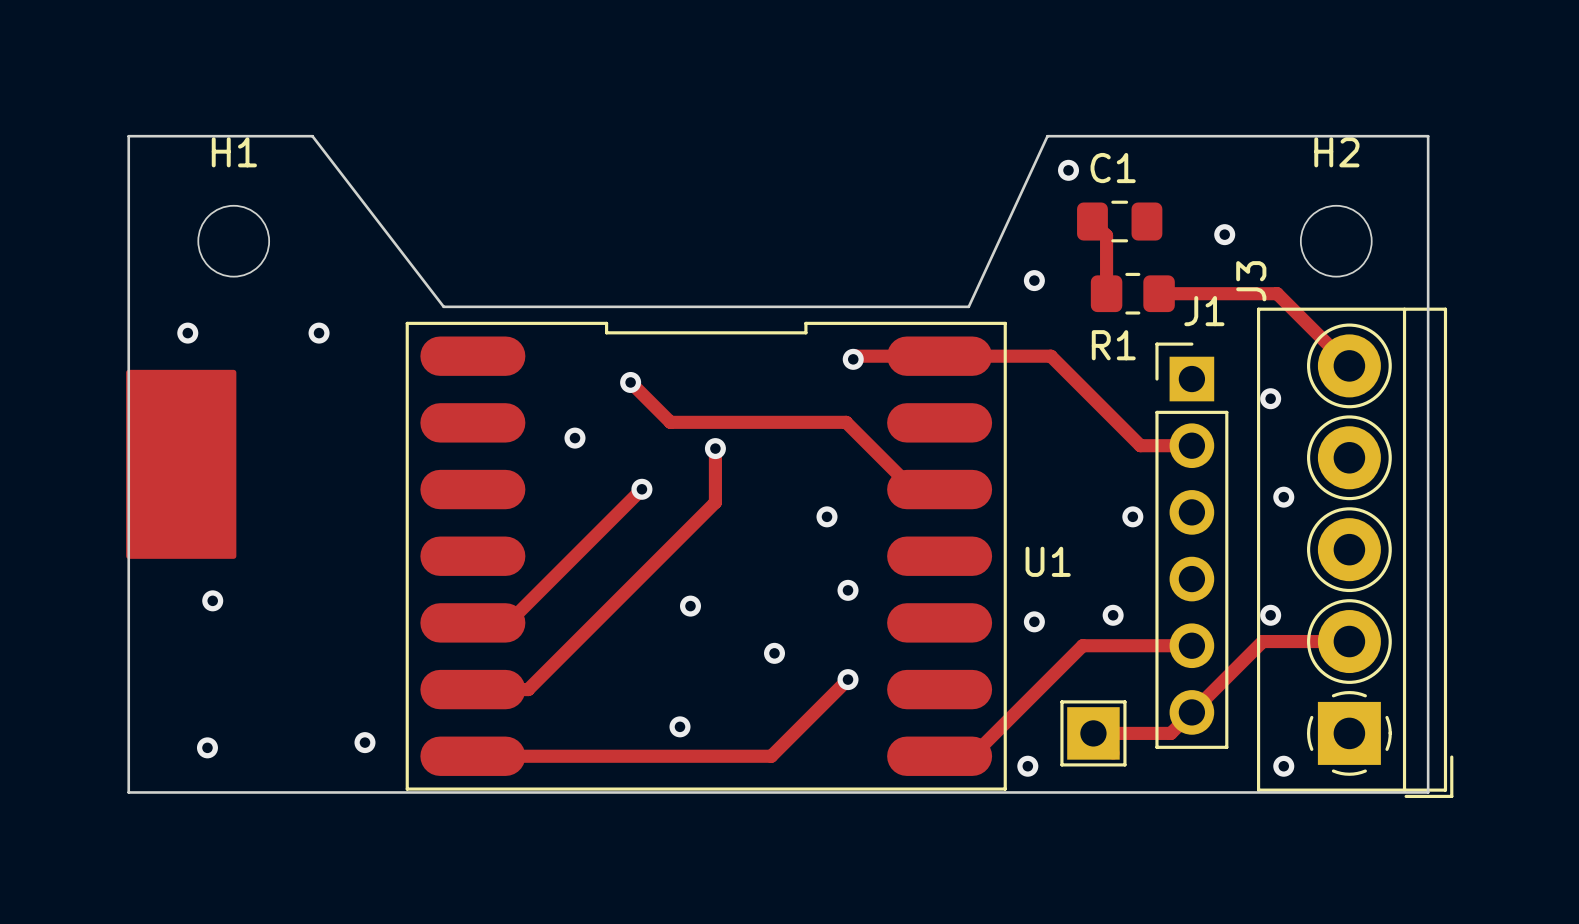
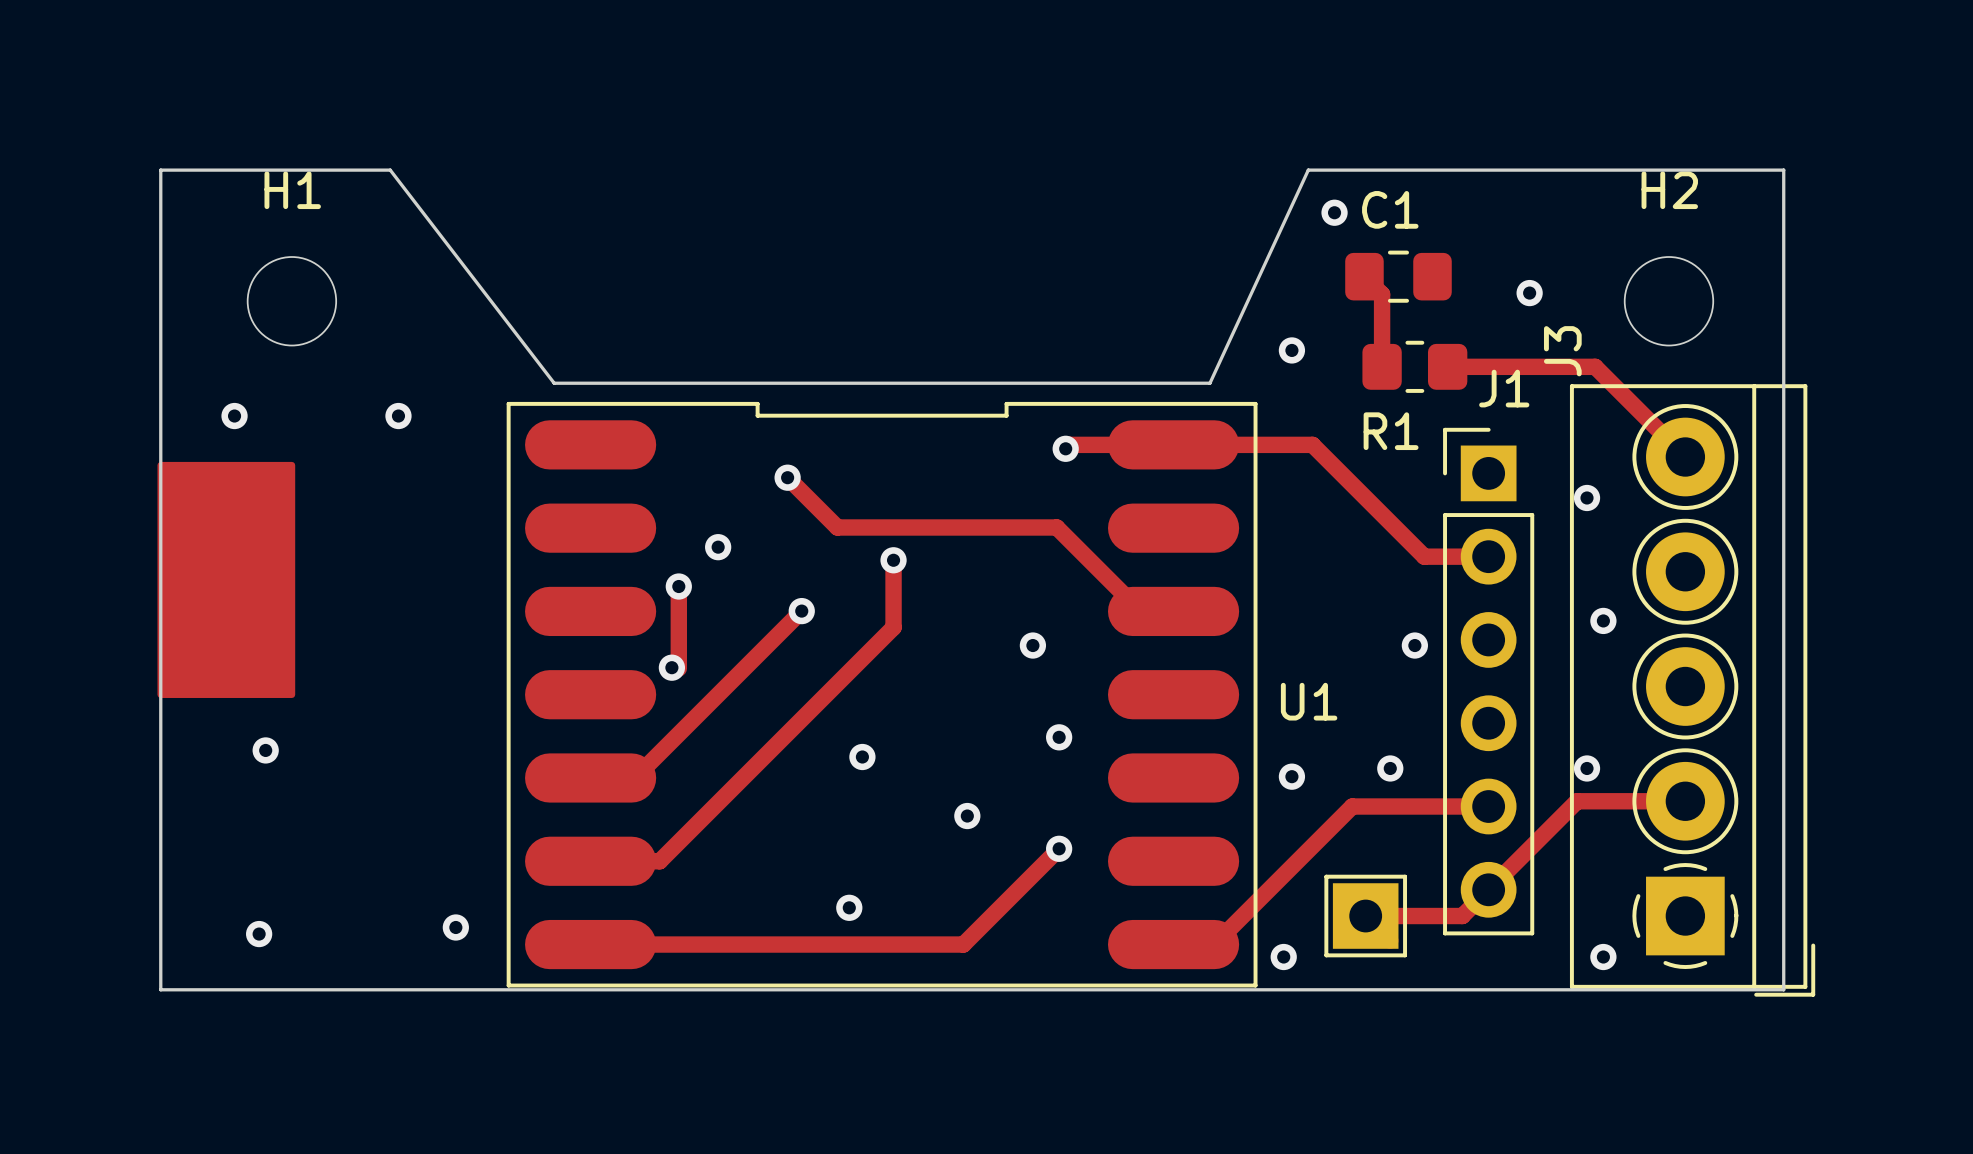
track: none -> (678, 586) (678, 668)
via: none -> (678, 586)
via: none -> (671, 667)

